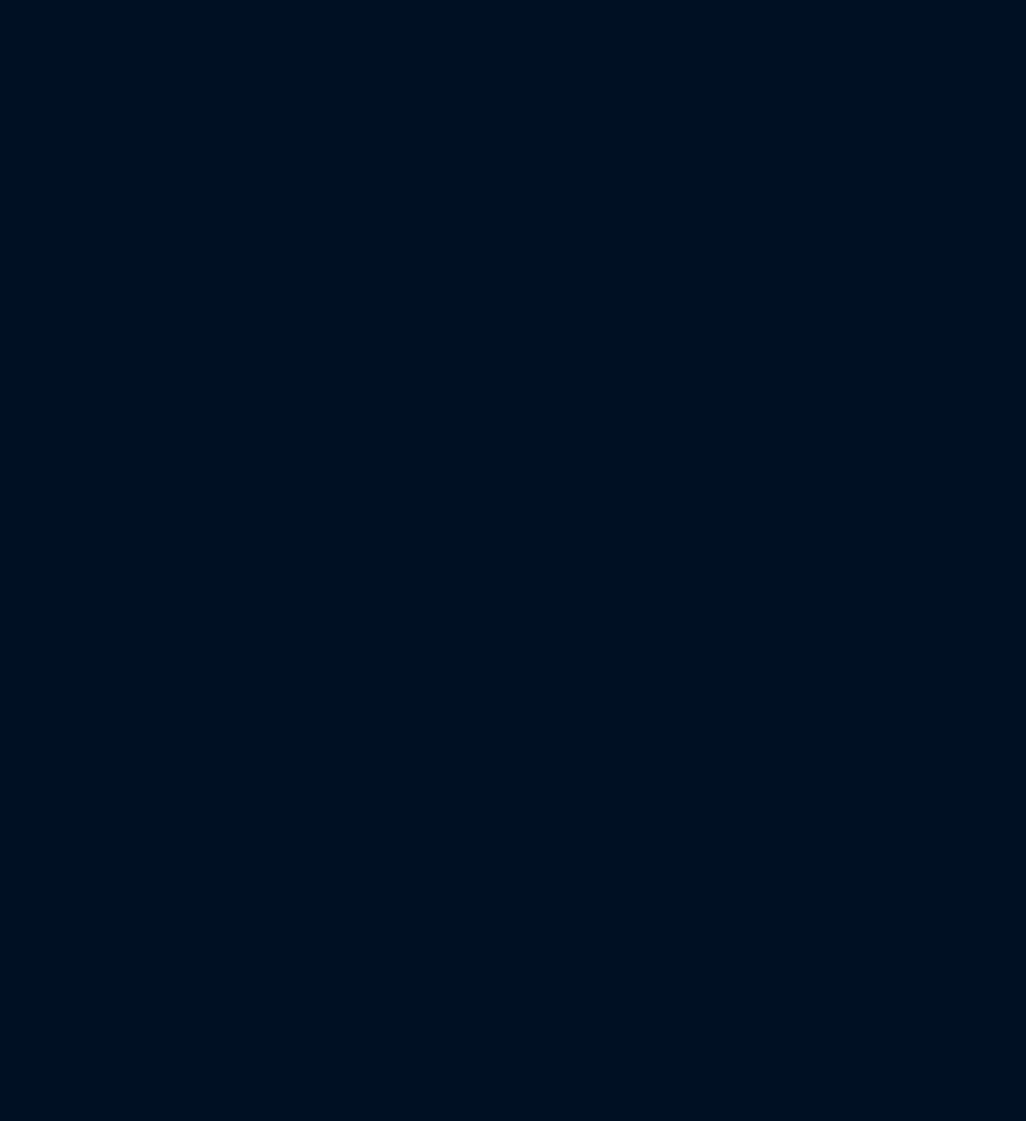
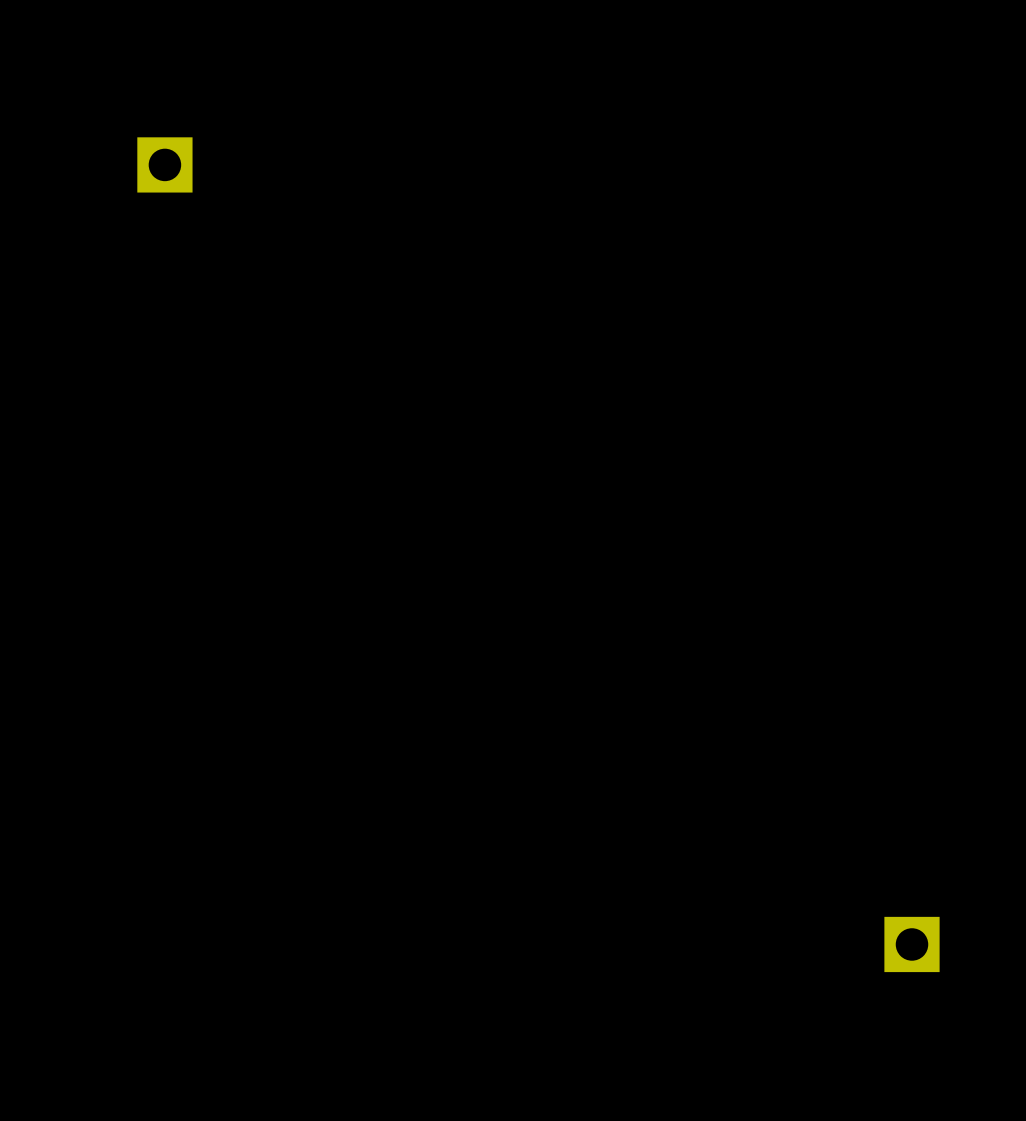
part: none -> (164, 164)
part: none -> (911, 944)

